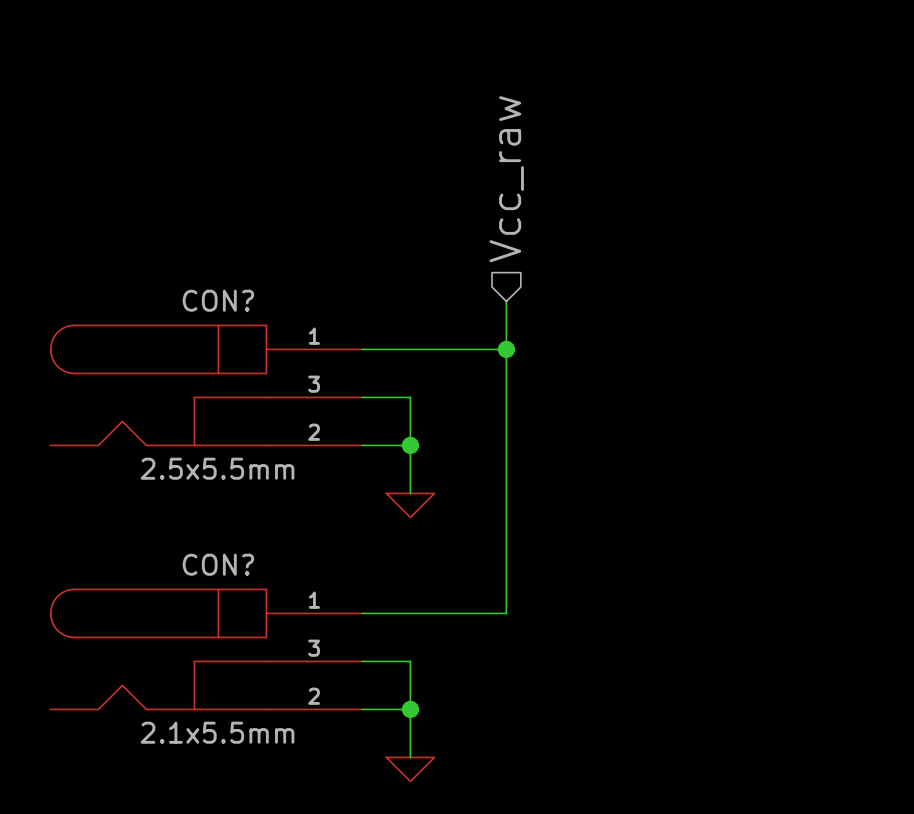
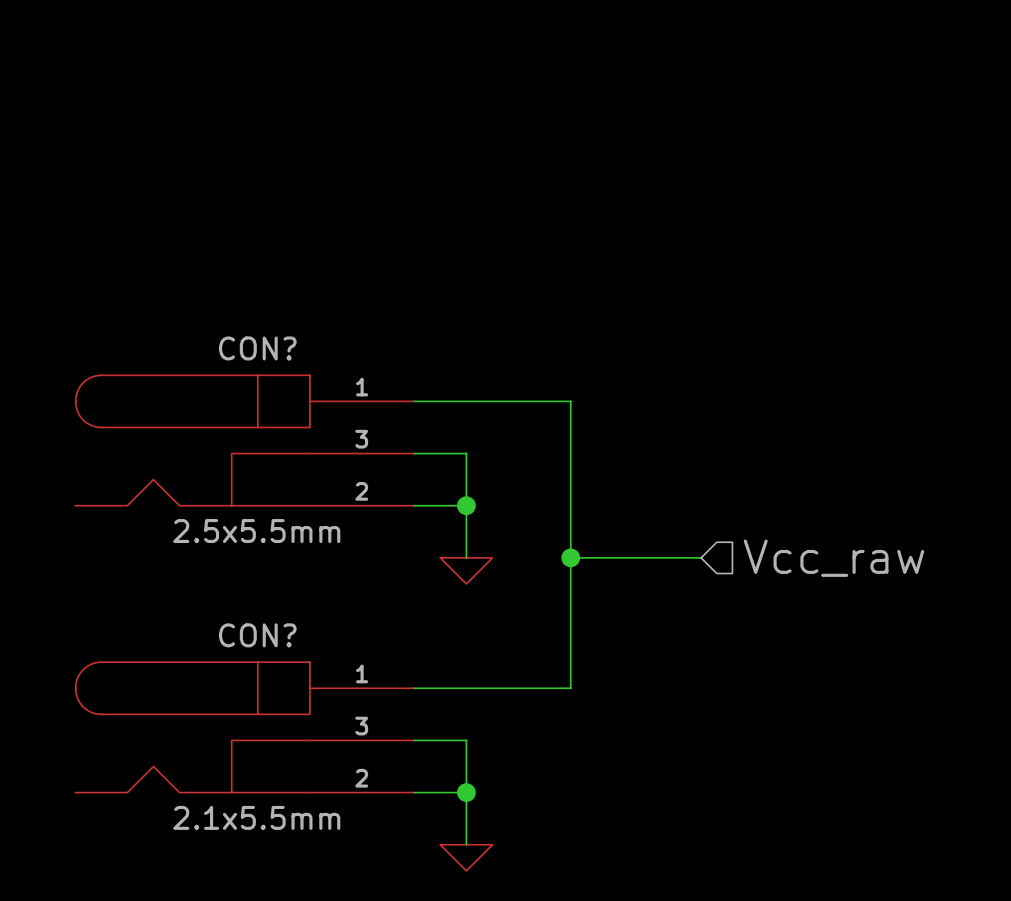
hierarchical label rotation: 0° (506, 179) -> 90° clockwise (833, 558)
hierarchical label position: Vcc_raw (506, 179) -> Vcc_raw (833, 558)
wire: (506, 301) (506, 349) -> none
junction: (506, 349) -> none
wire: none -> (570, 557) (701, 557)
junction: none -> (570, 557)

